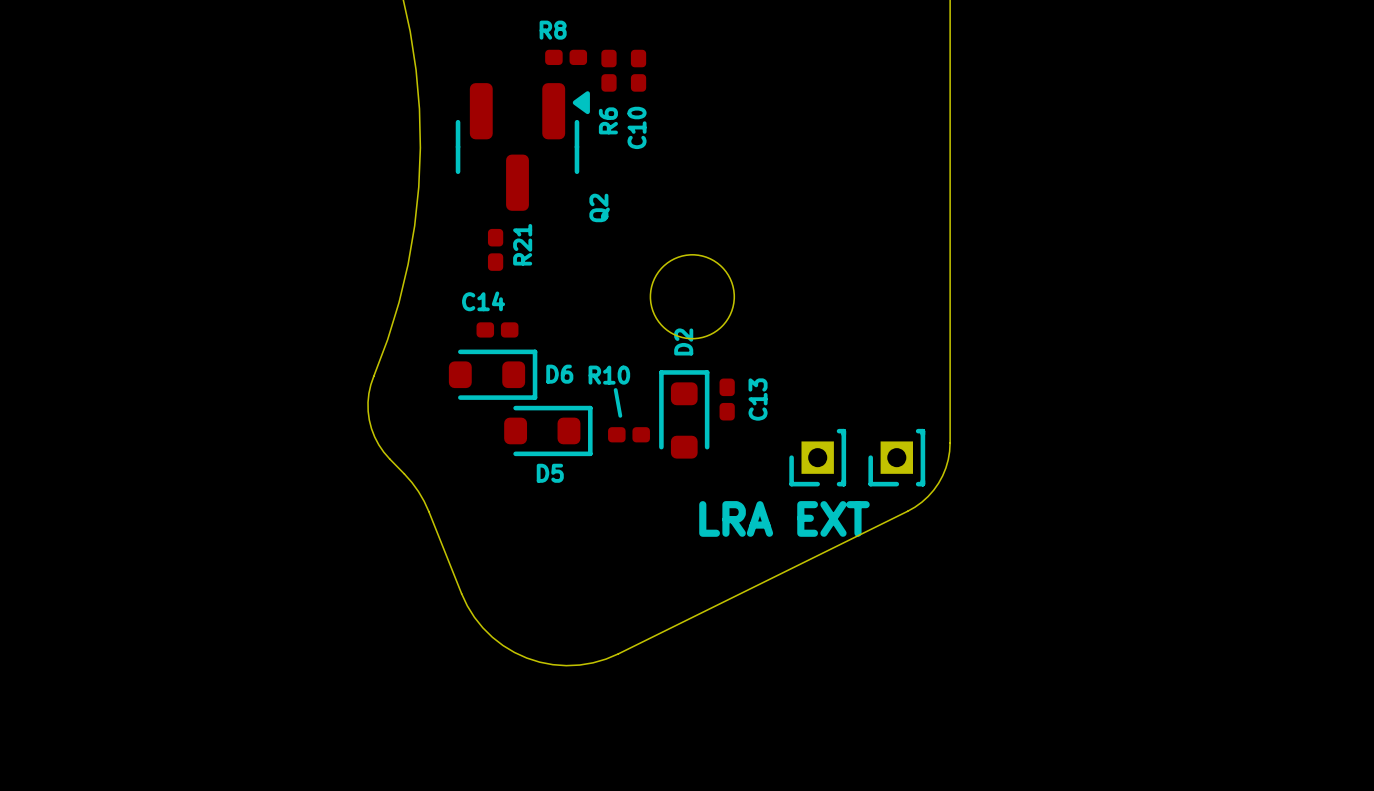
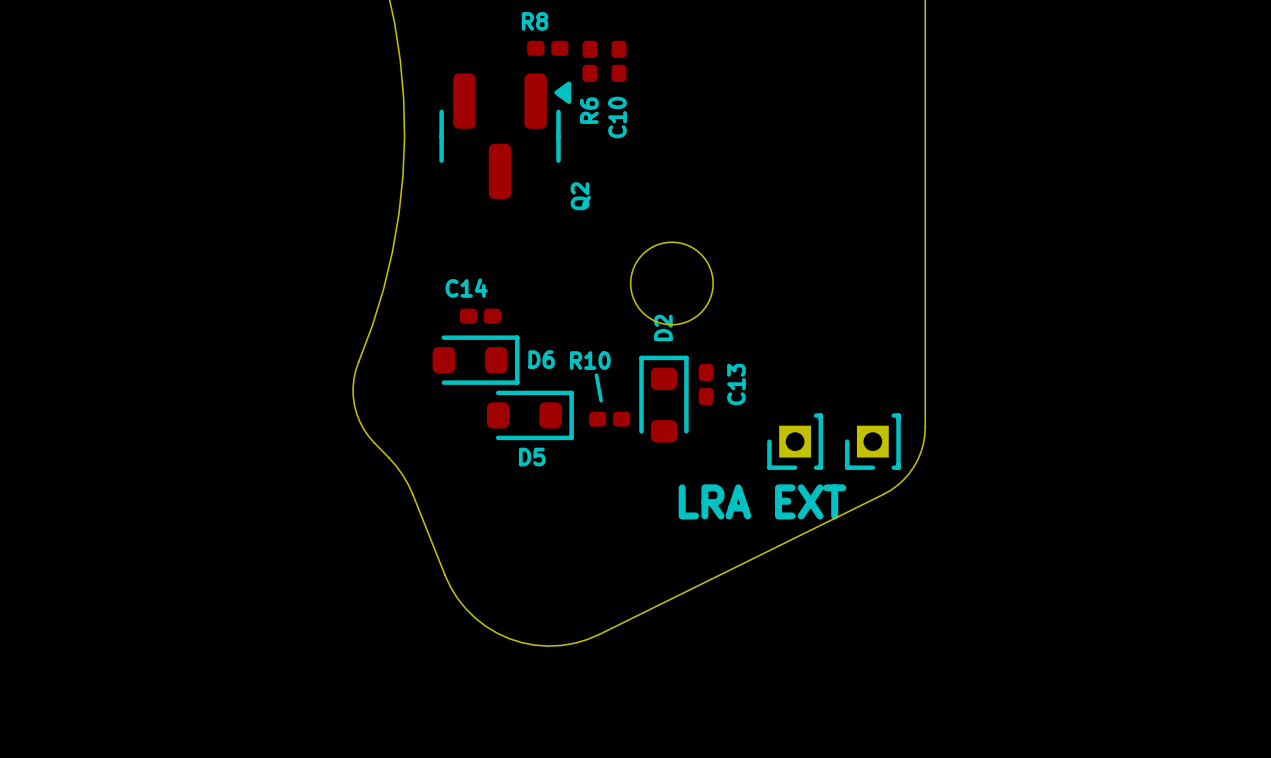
R21: (495, 249) -> none

